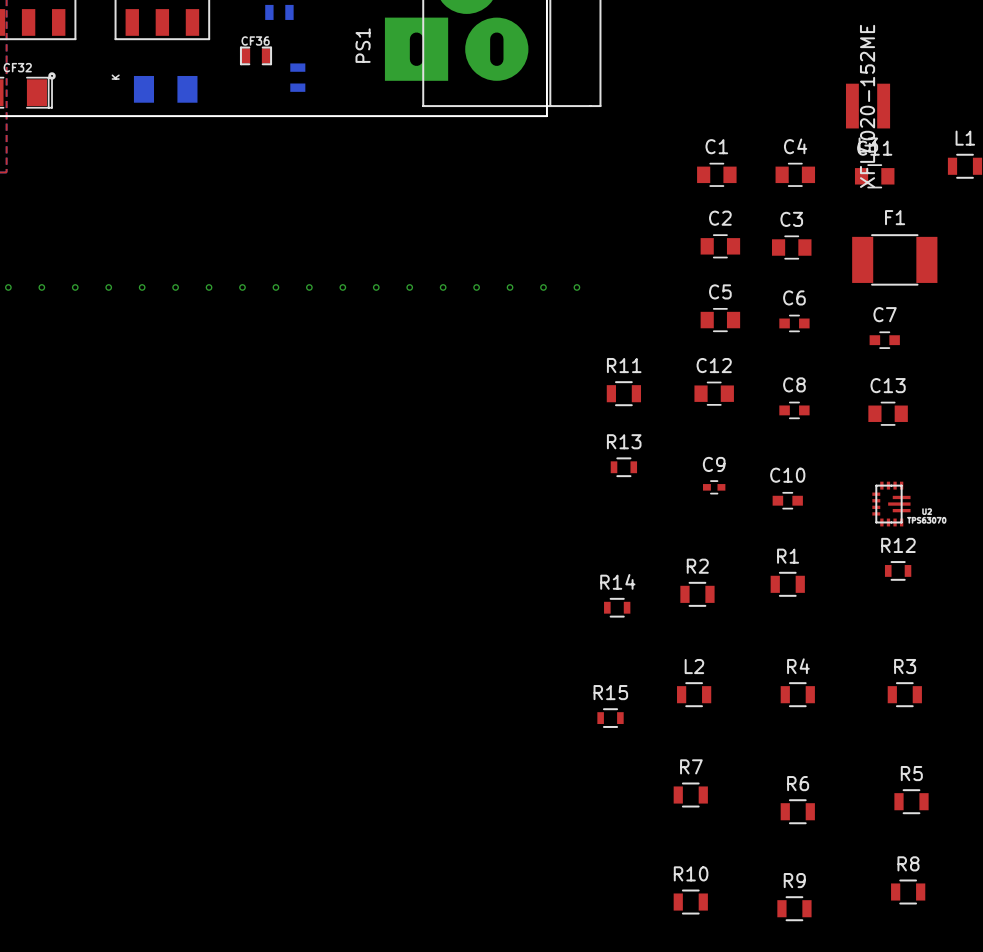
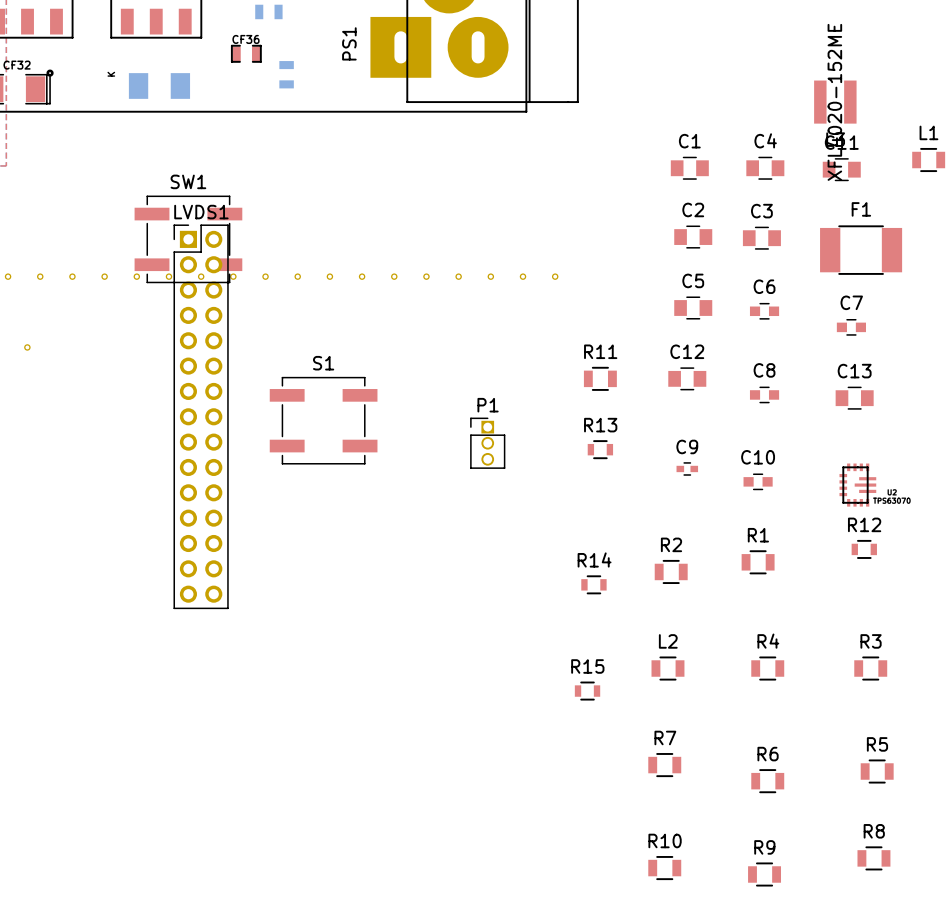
SW1: none -> (188, 239)
part: none -> (27, 347)
LVDS1: none -> (201, 416)
S1: none -> (323, 420)
P1: none -> (487, 443)

